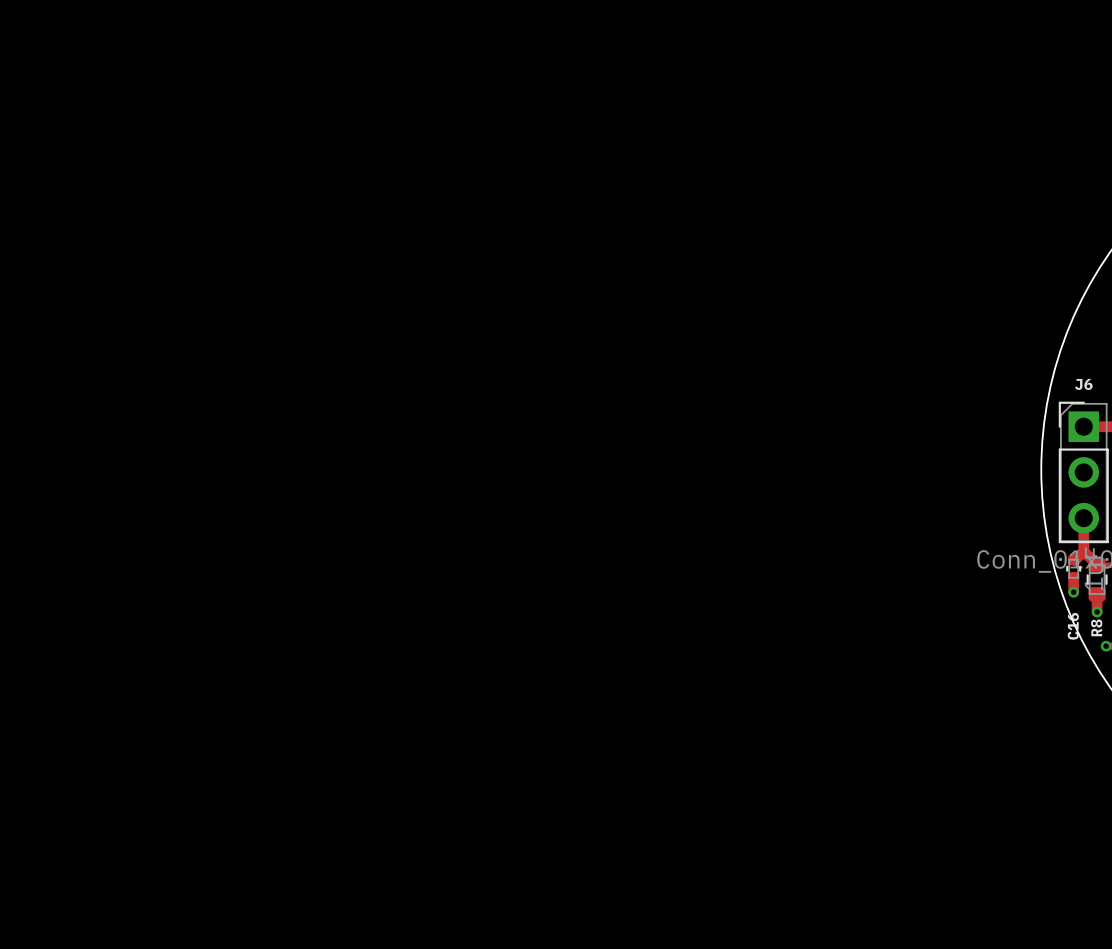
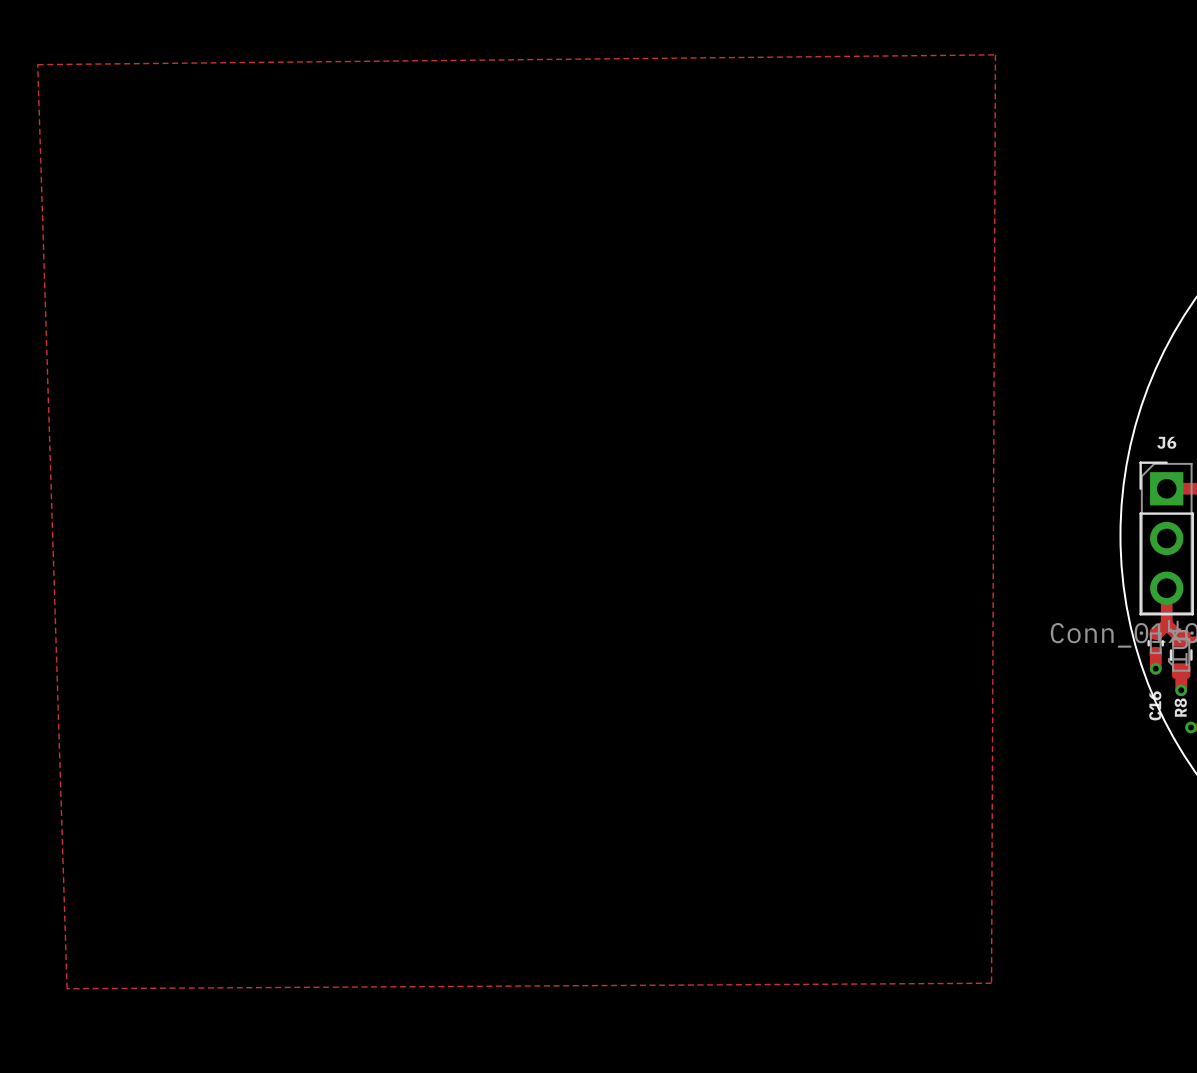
zone outline: none -> (995, 54) (37, 64) (67, 988) (991, 983) (995, 54)

